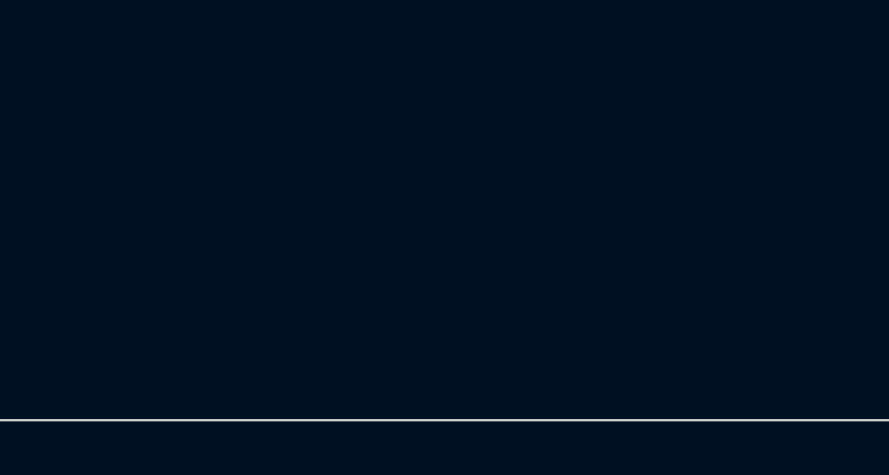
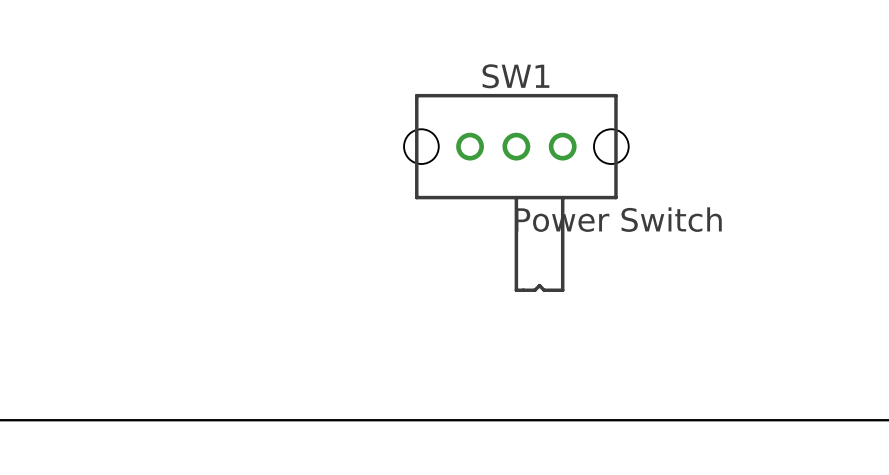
SW1: none -> Power Switch (516, 192)

